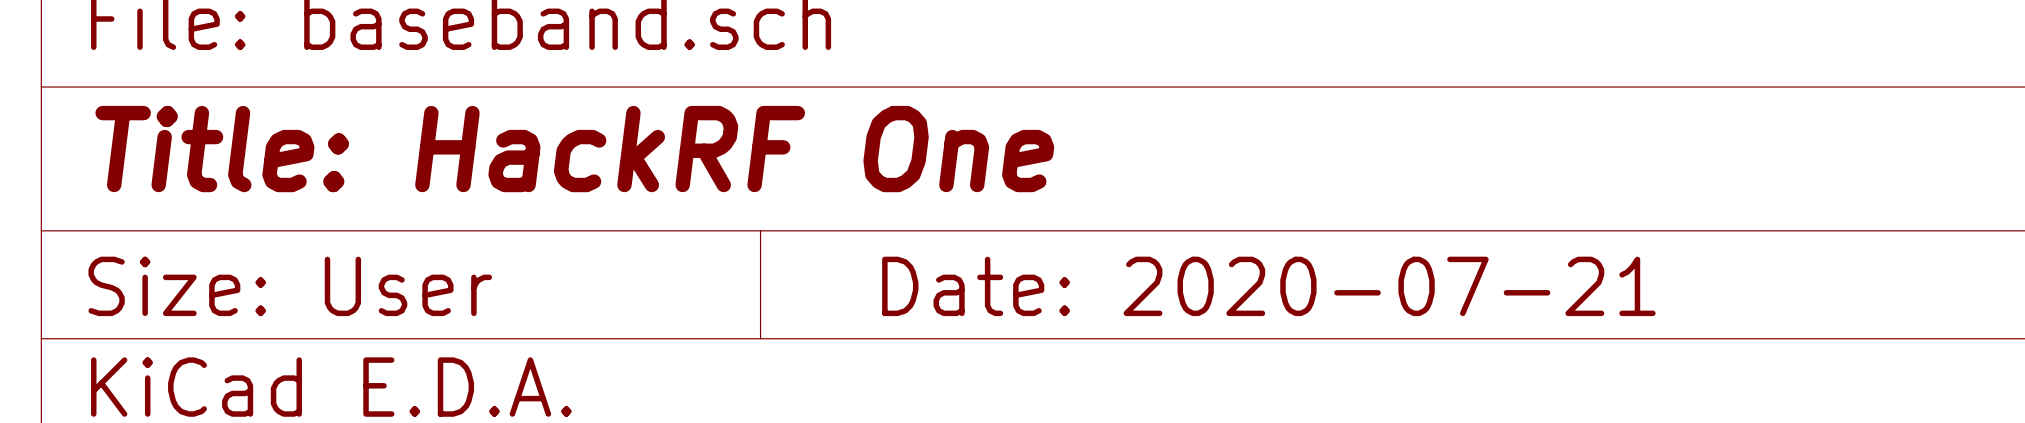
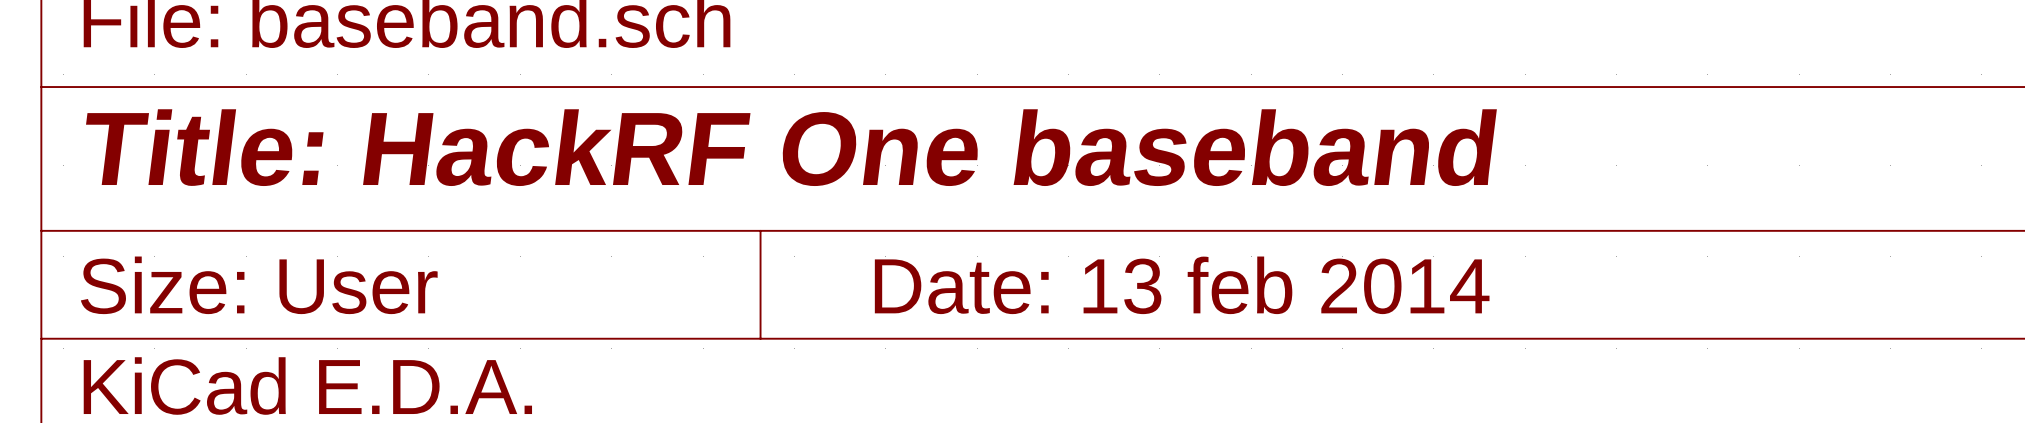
title block: Title: HackRF One (574, 149) -> Title: HackRF One baseband (791, 147)
title block: Date: 2020-07-21 (1268, 286) -> Date: 13 feb 2014 (1182, 285)

